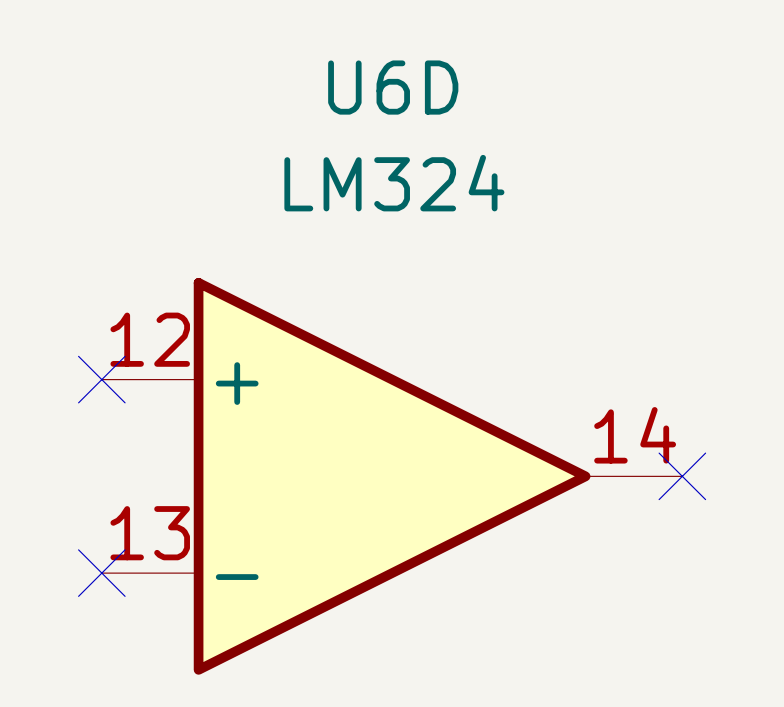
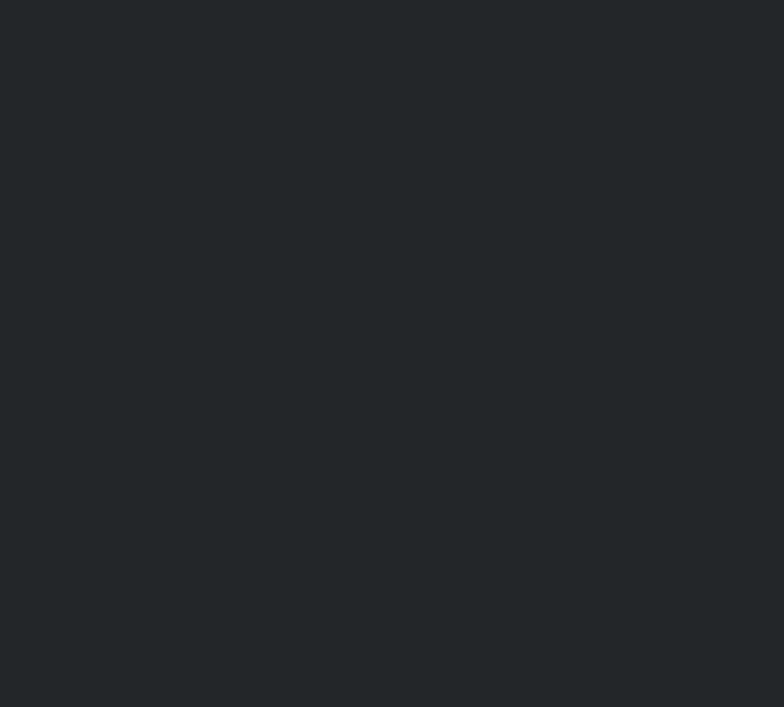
no-connect mark: (101, 379) -> none
U6D: LM324 (392, 476) -> none
no-connect mark: (682, 476) -> none
no-connect mark: (101, 573) -> none

